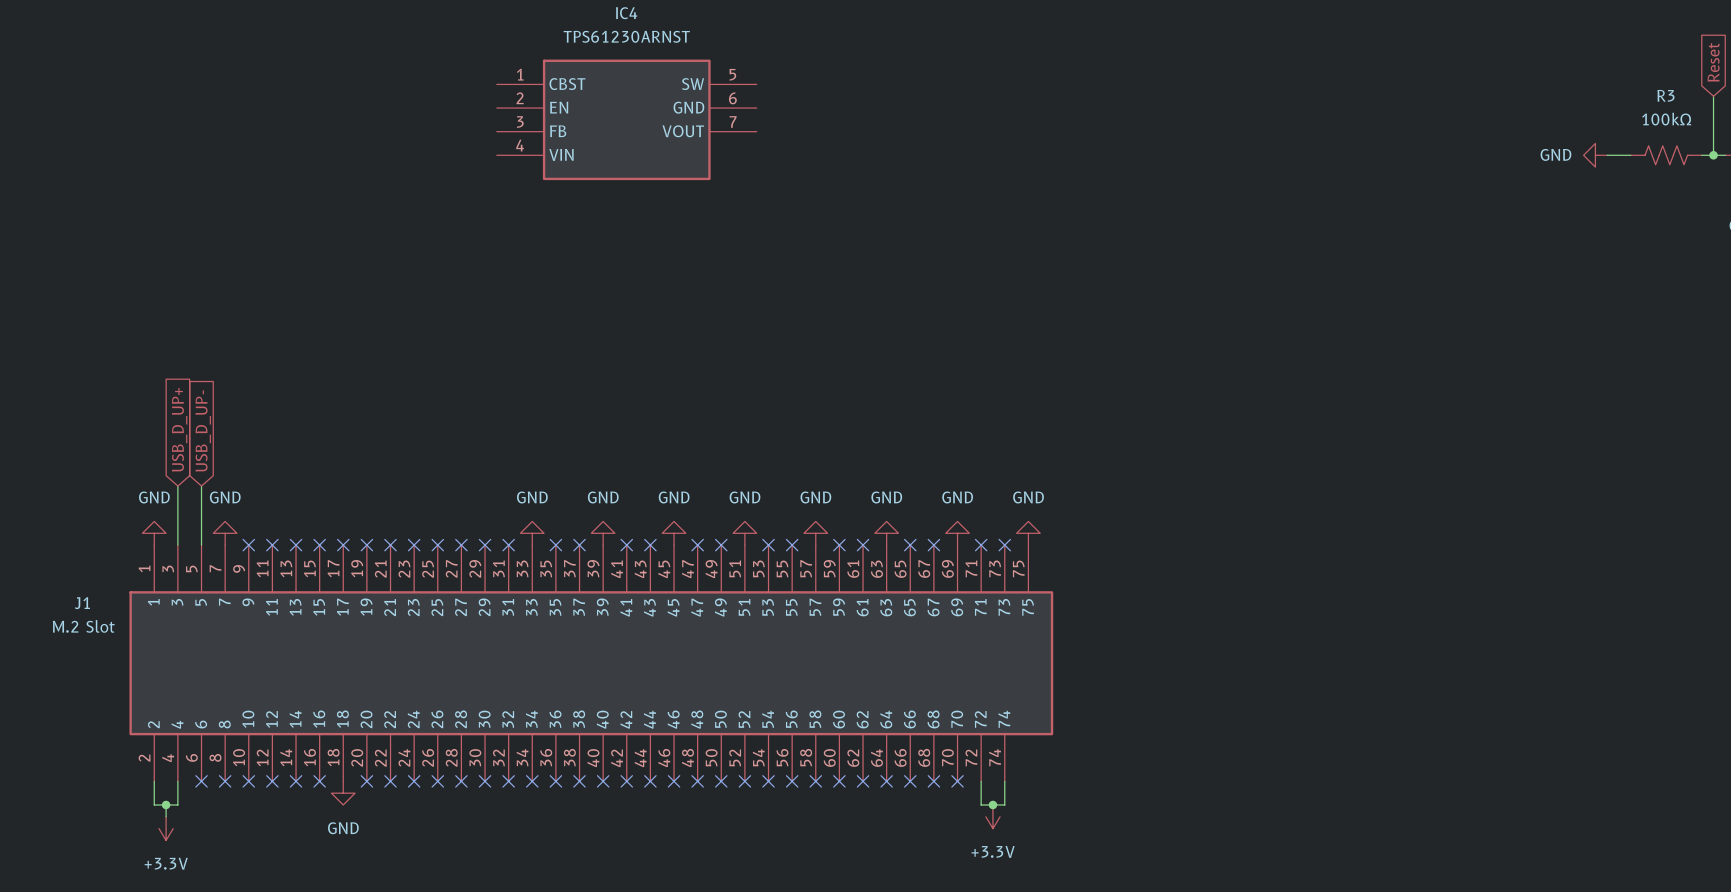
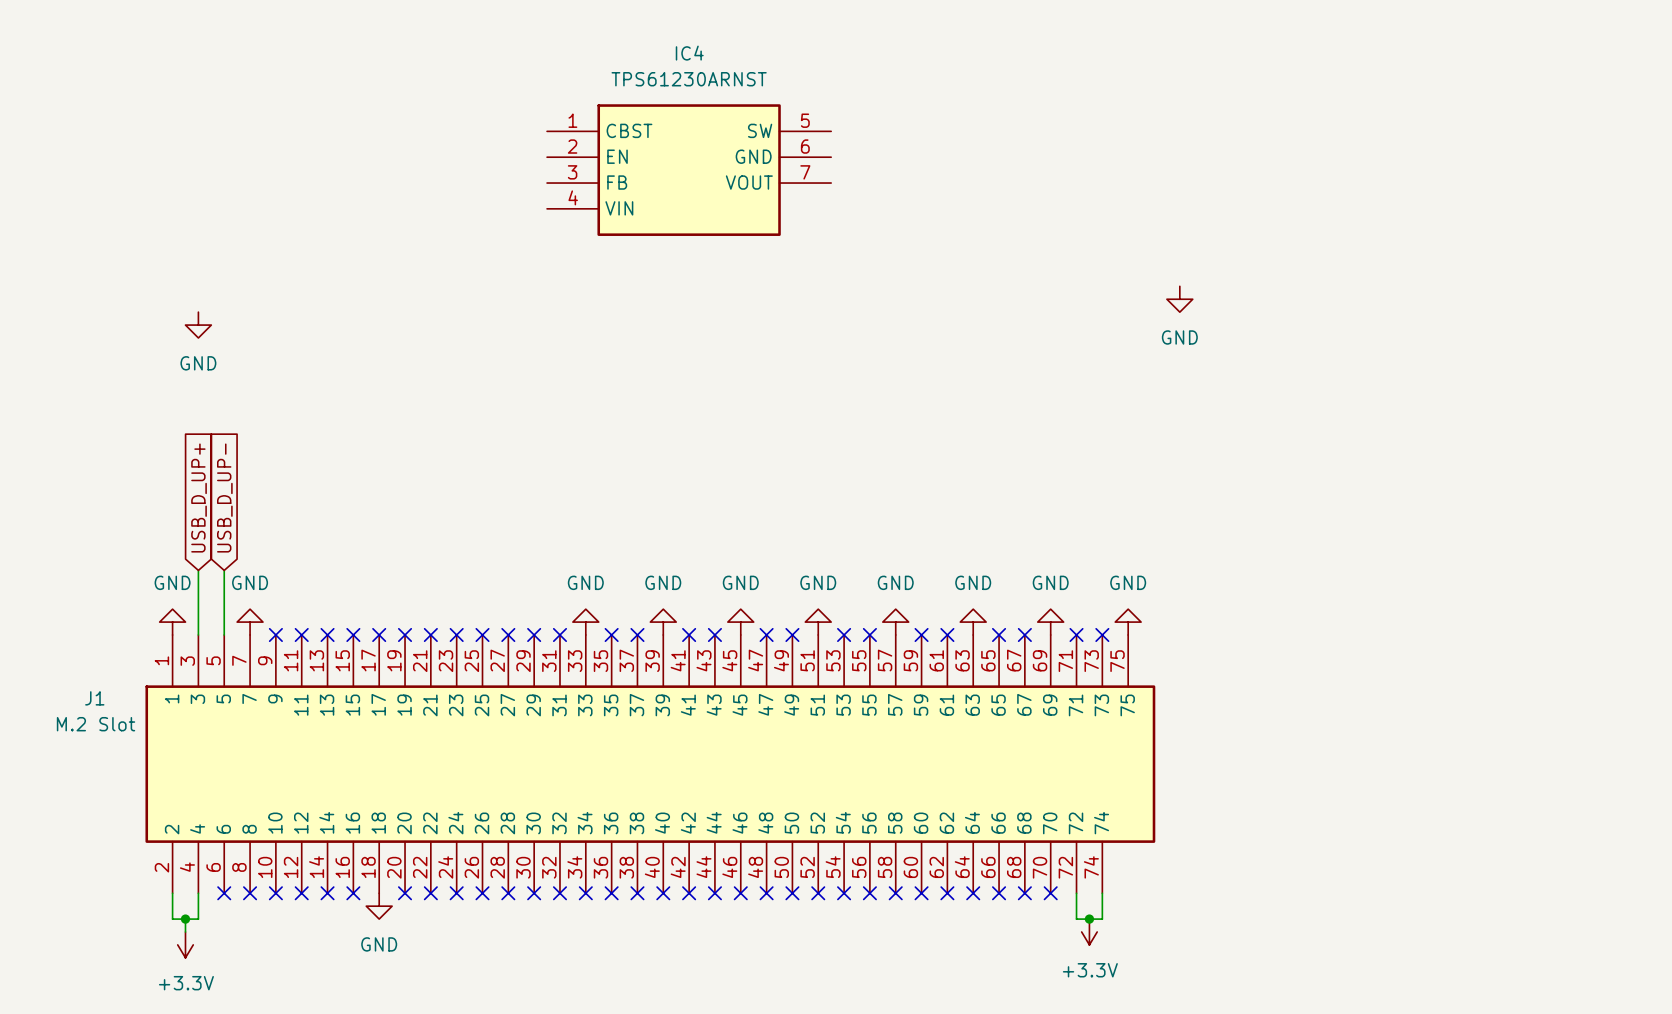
power symbol: none -> GND (1179, 299)
power symbol: none -> GND (198, 325)

